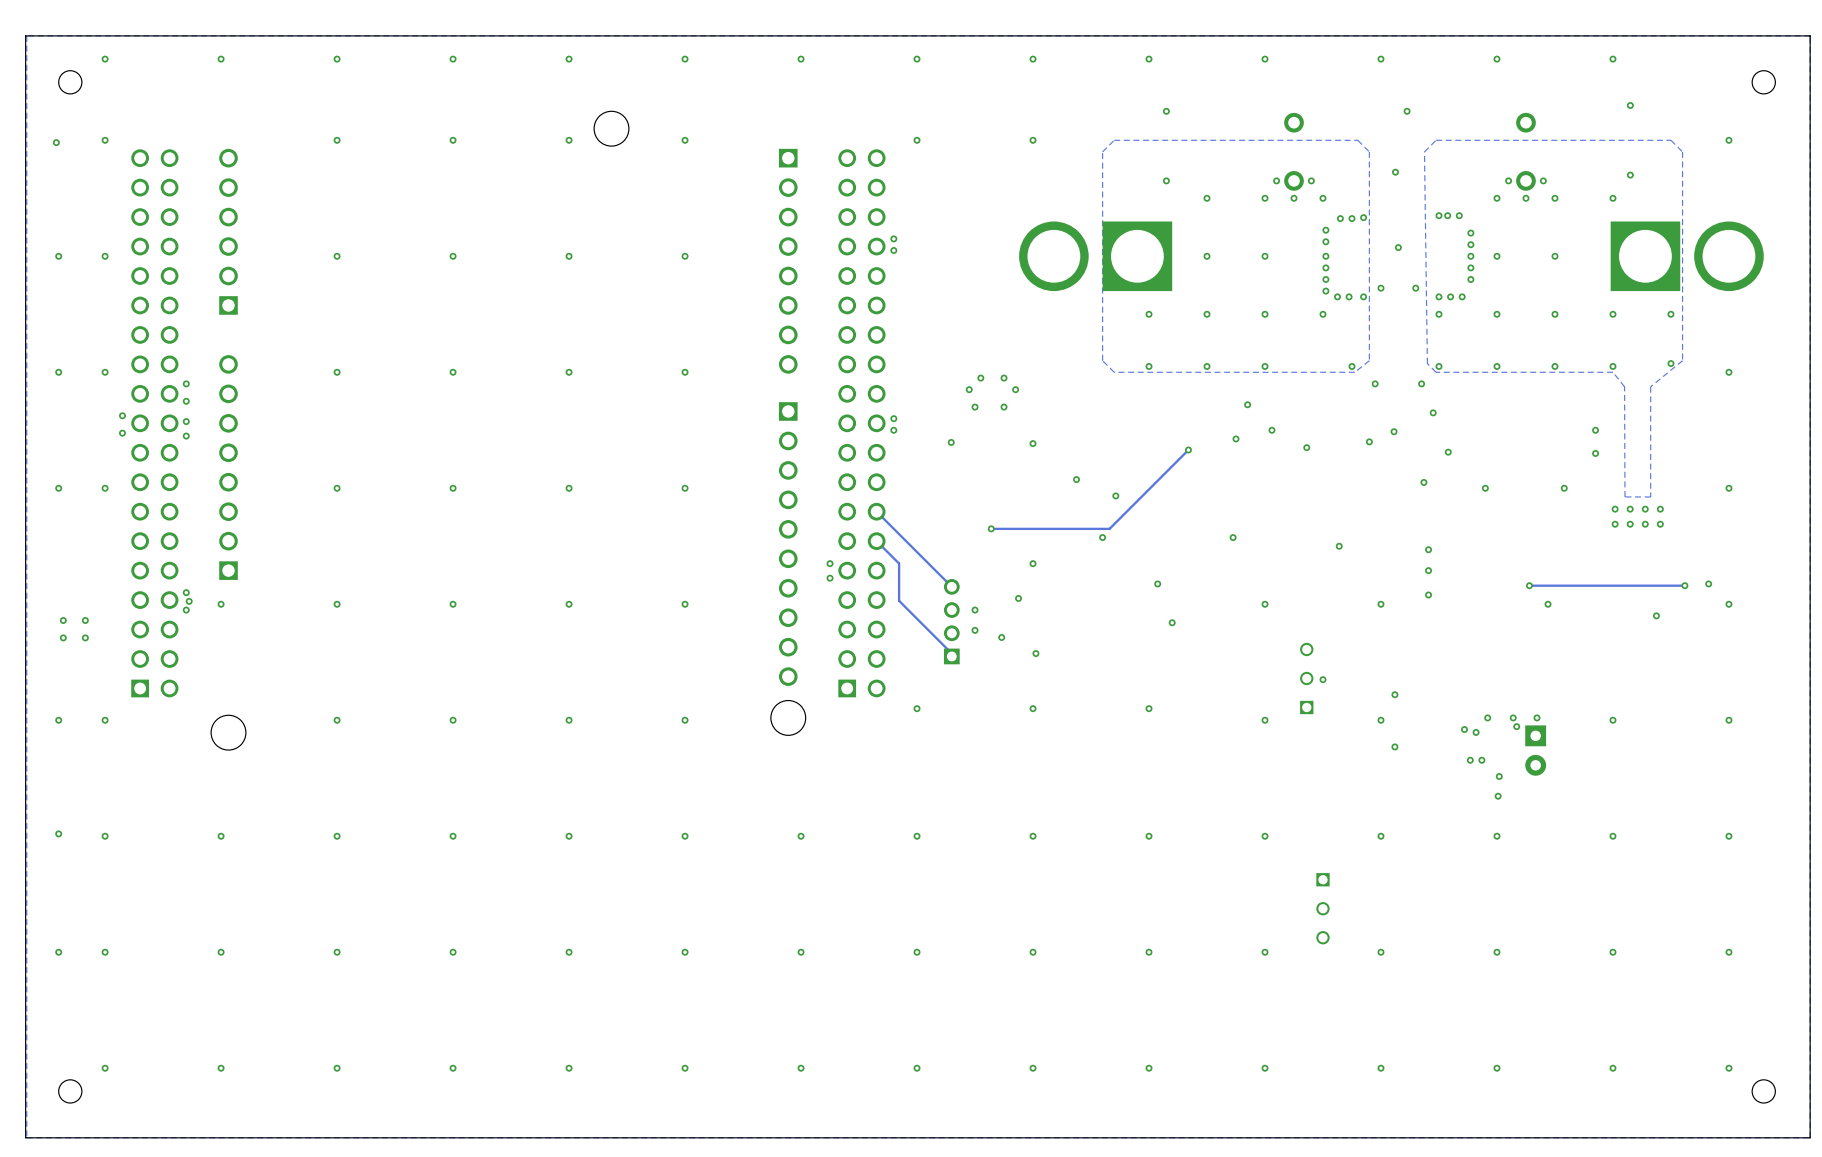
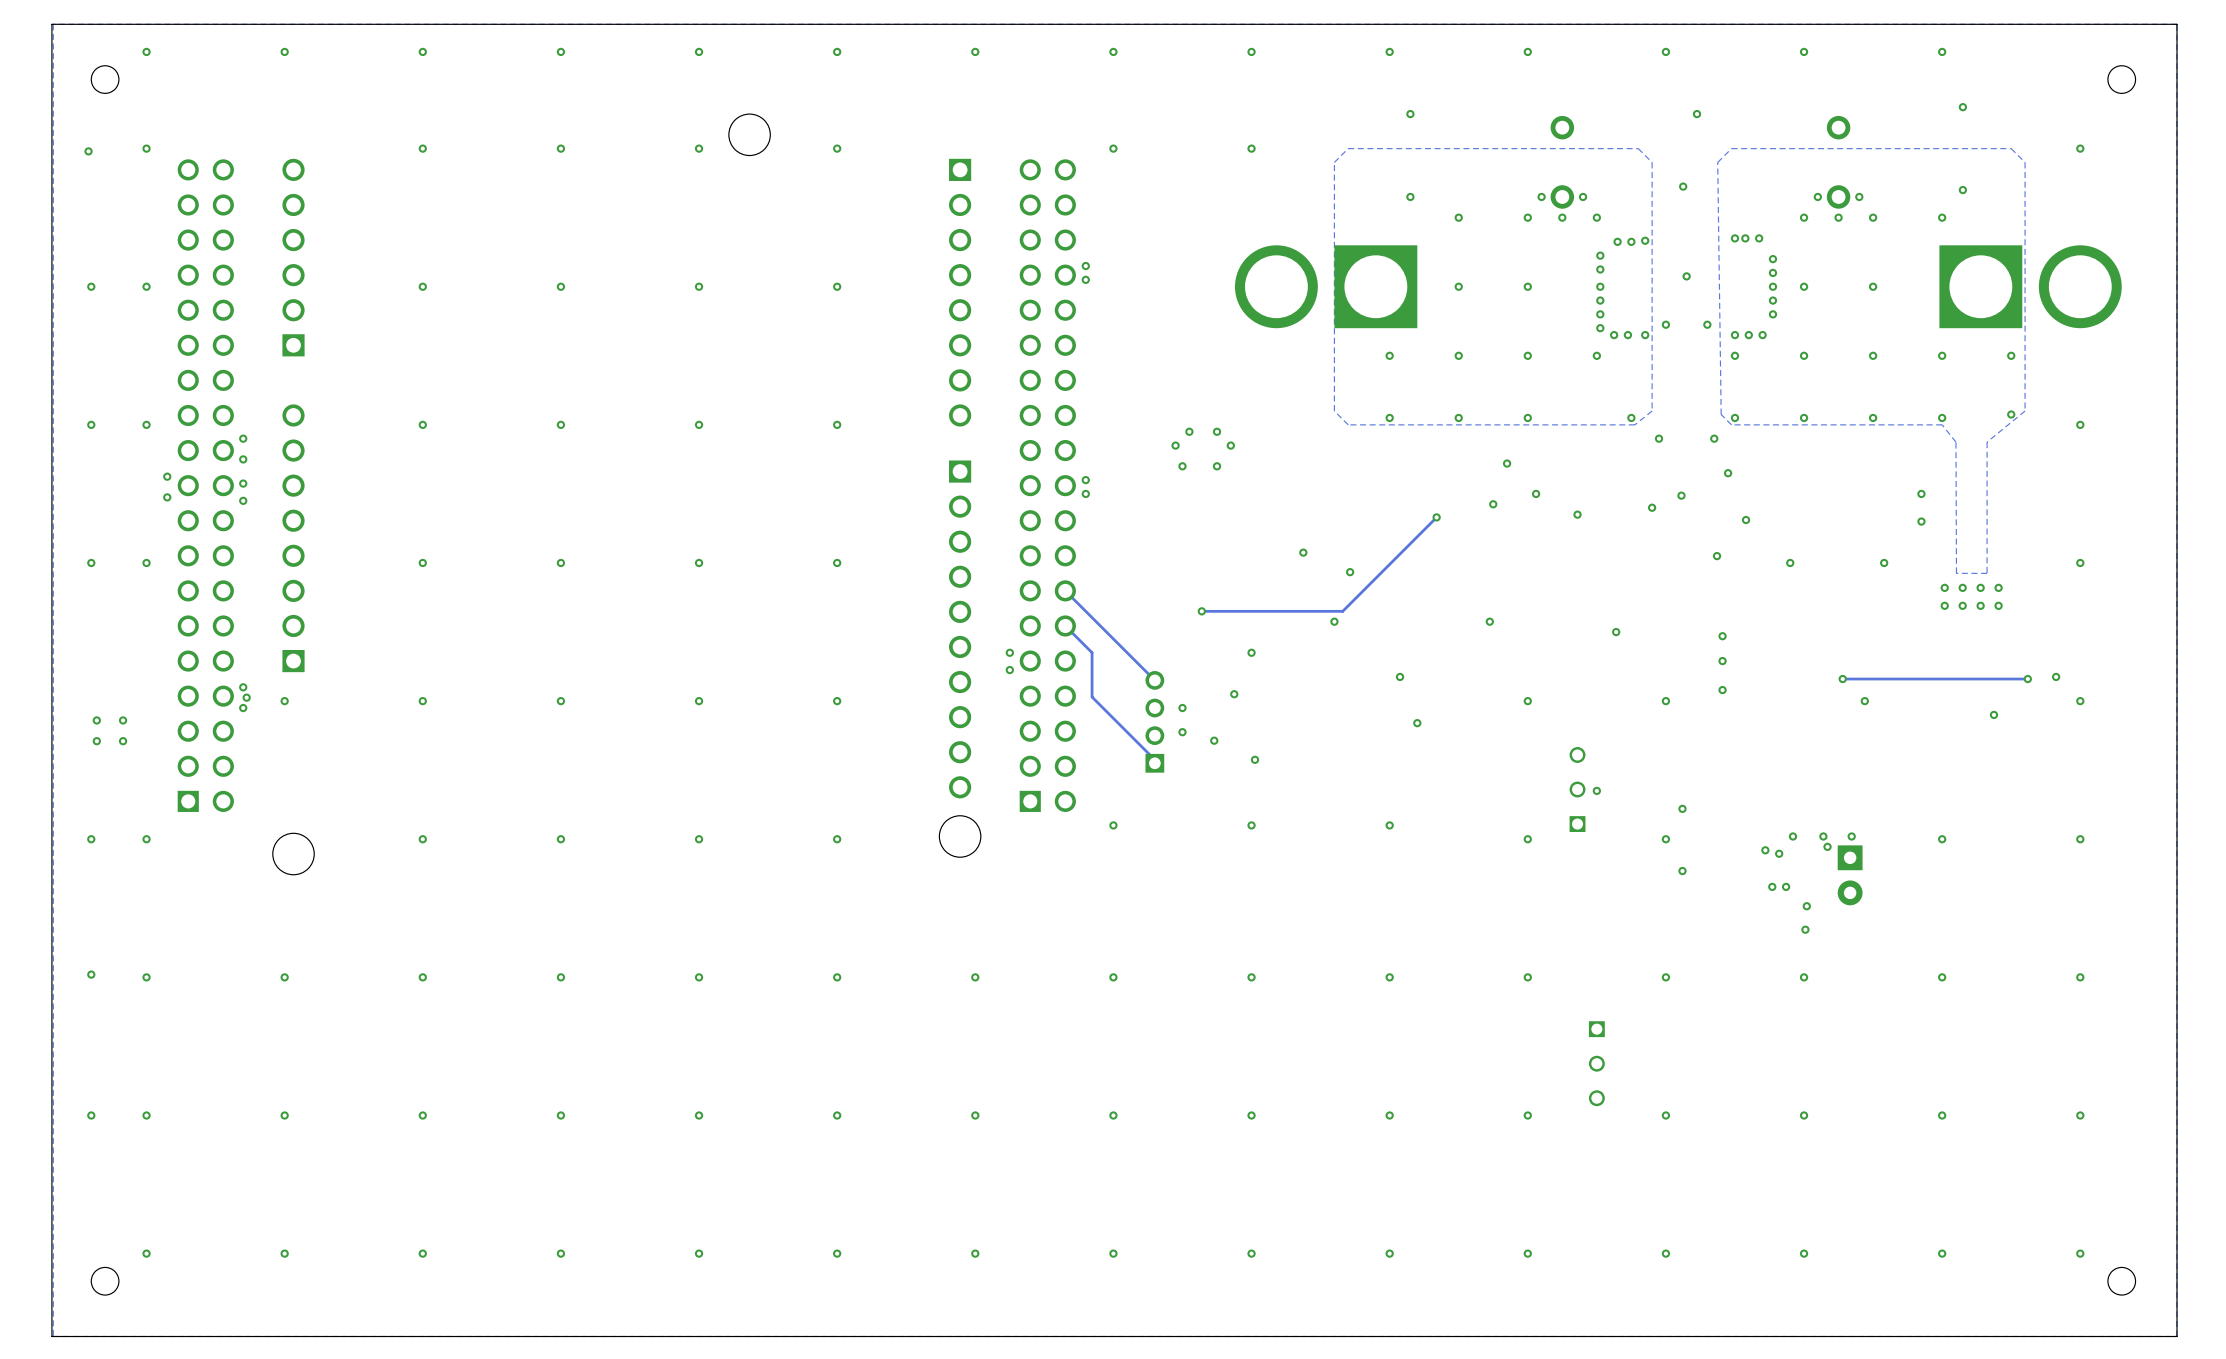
via: (951, 442) -> none
via: (1033, 443) -> none

